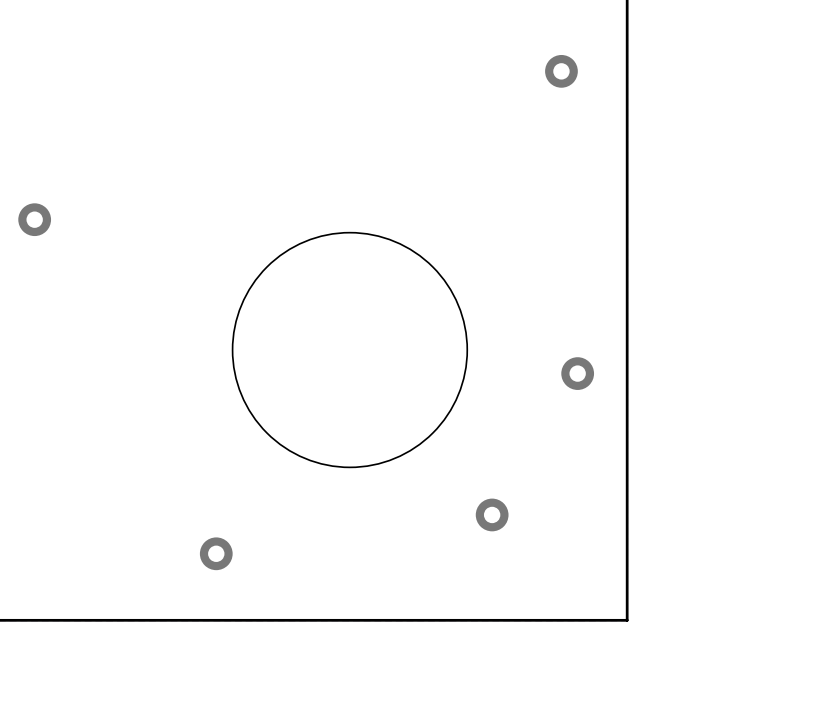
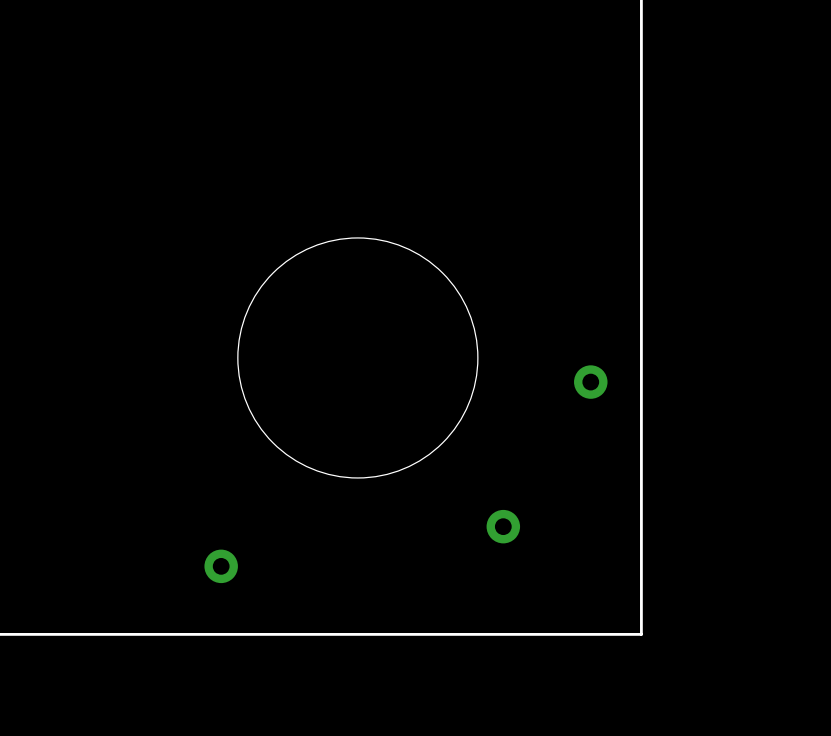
via: (561, 71) -> none
via: (34, 219) -> none

